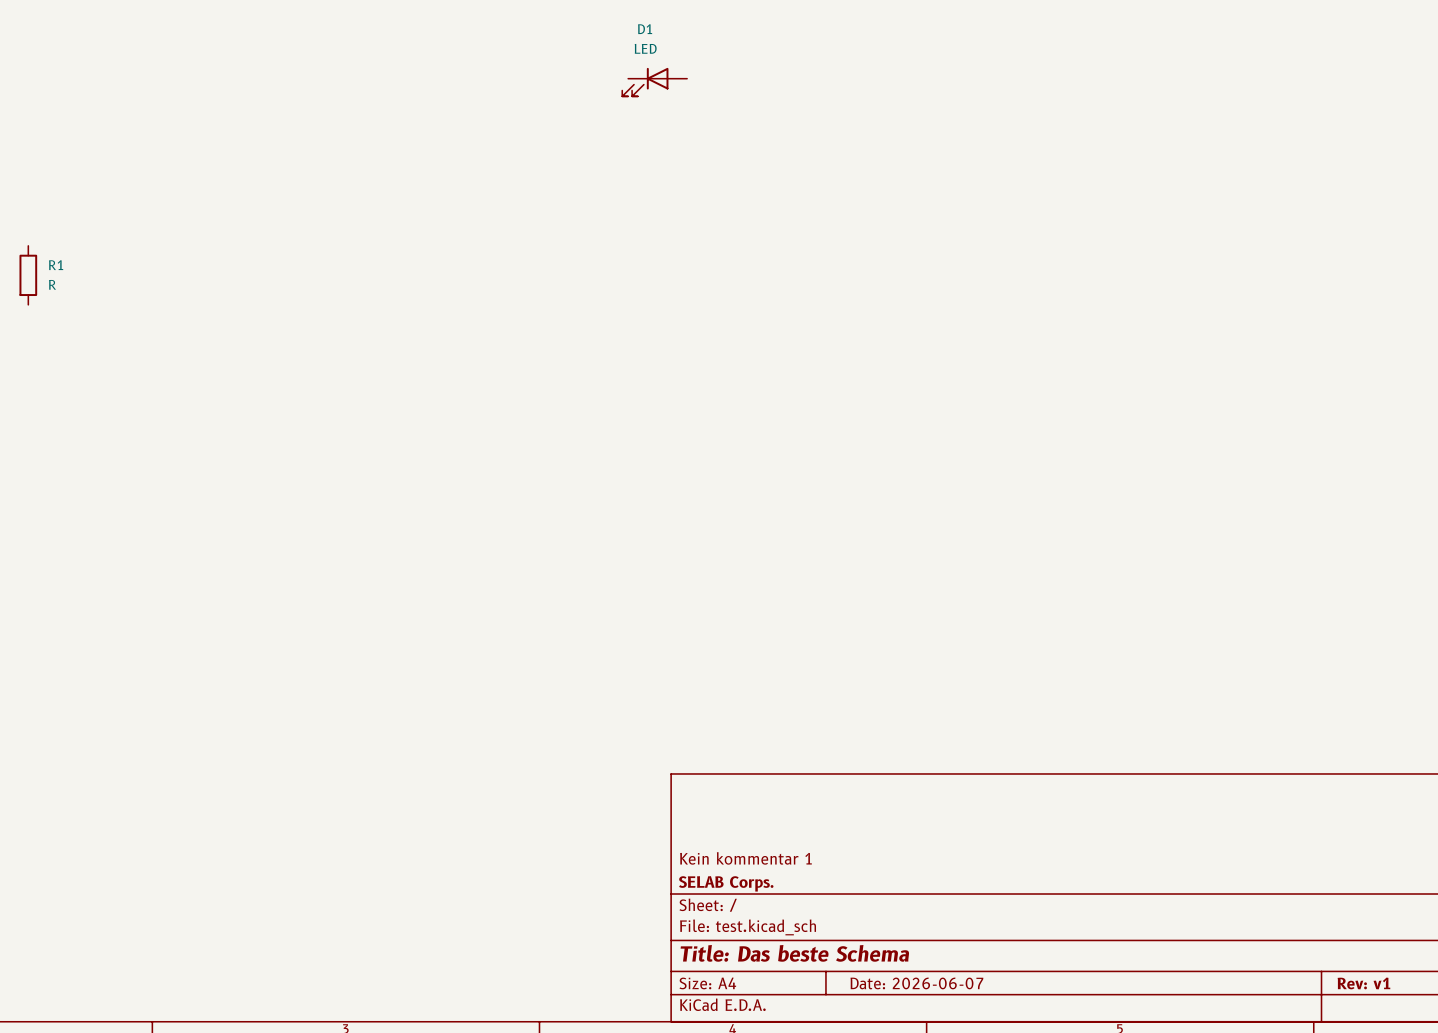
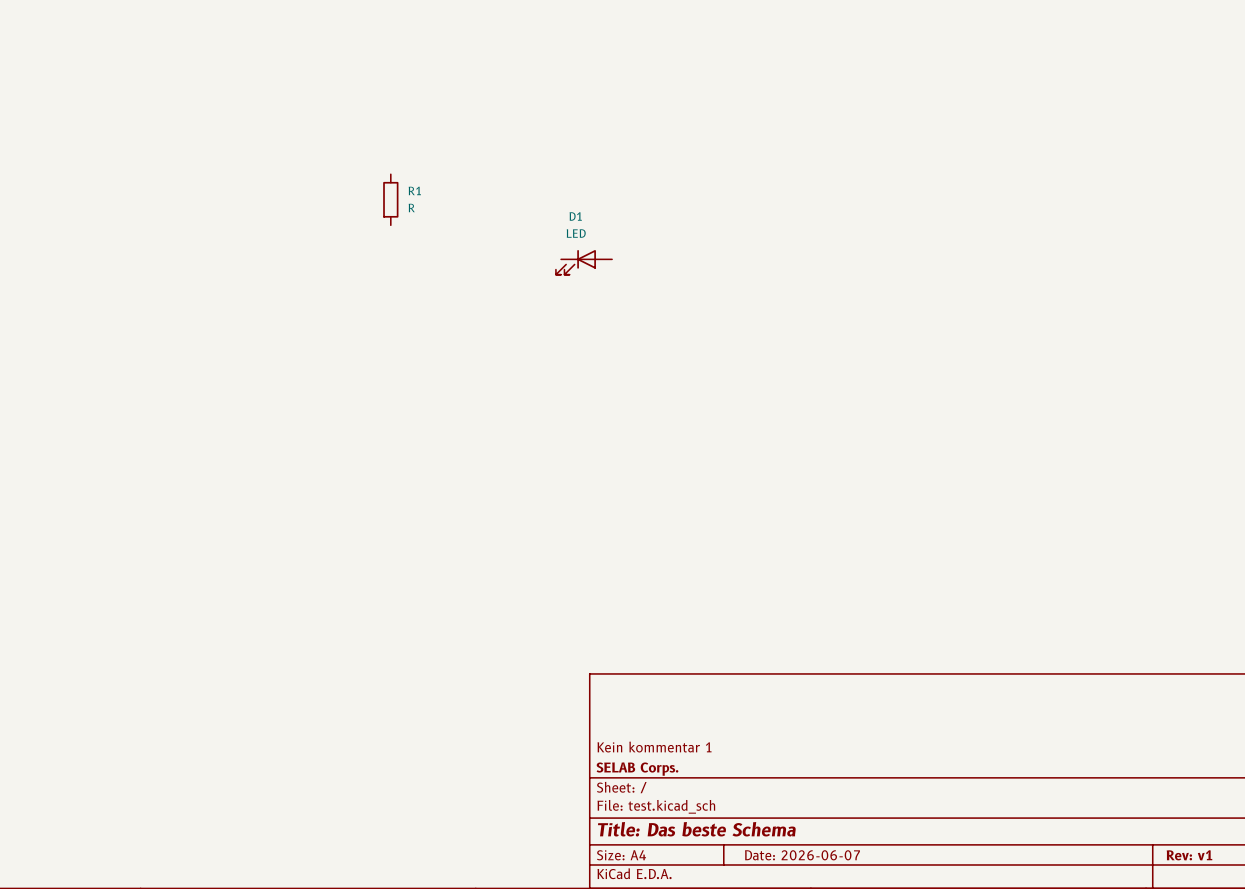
D1 position: (654, 82) -> (584, 262)
R1 position: (28, 275) -> (390, 199)

